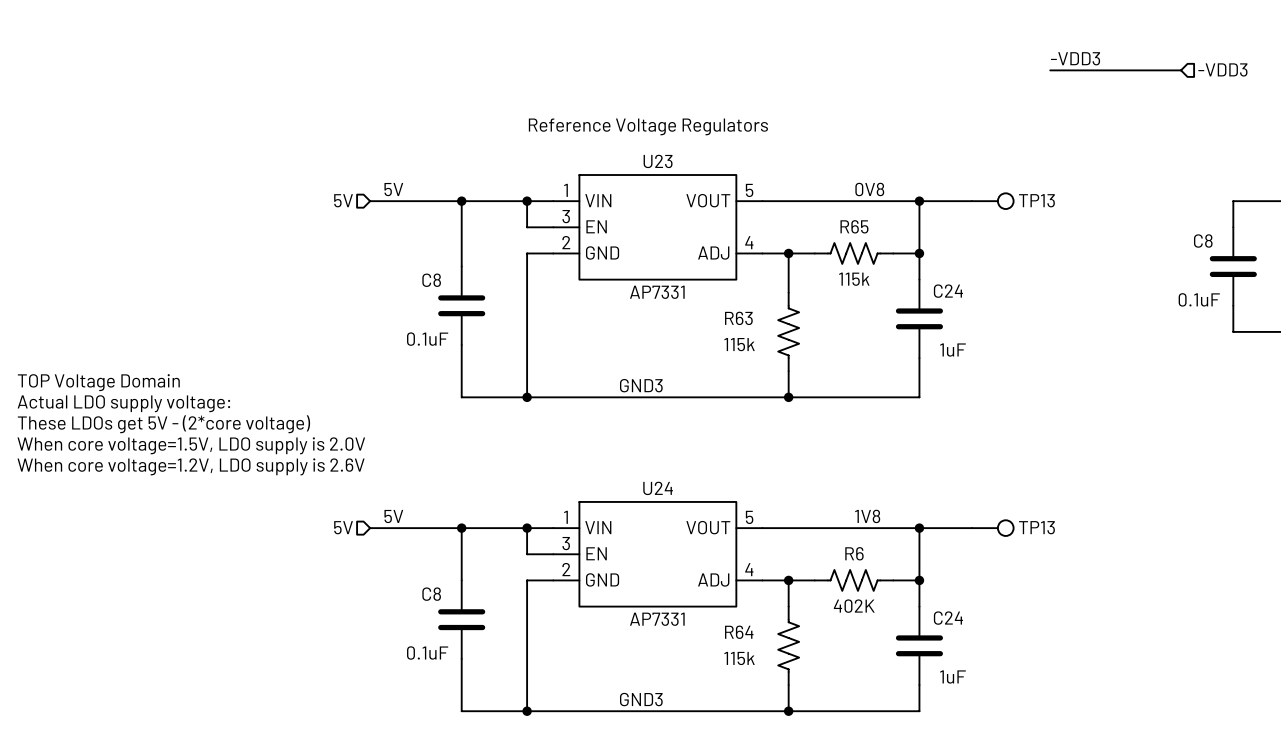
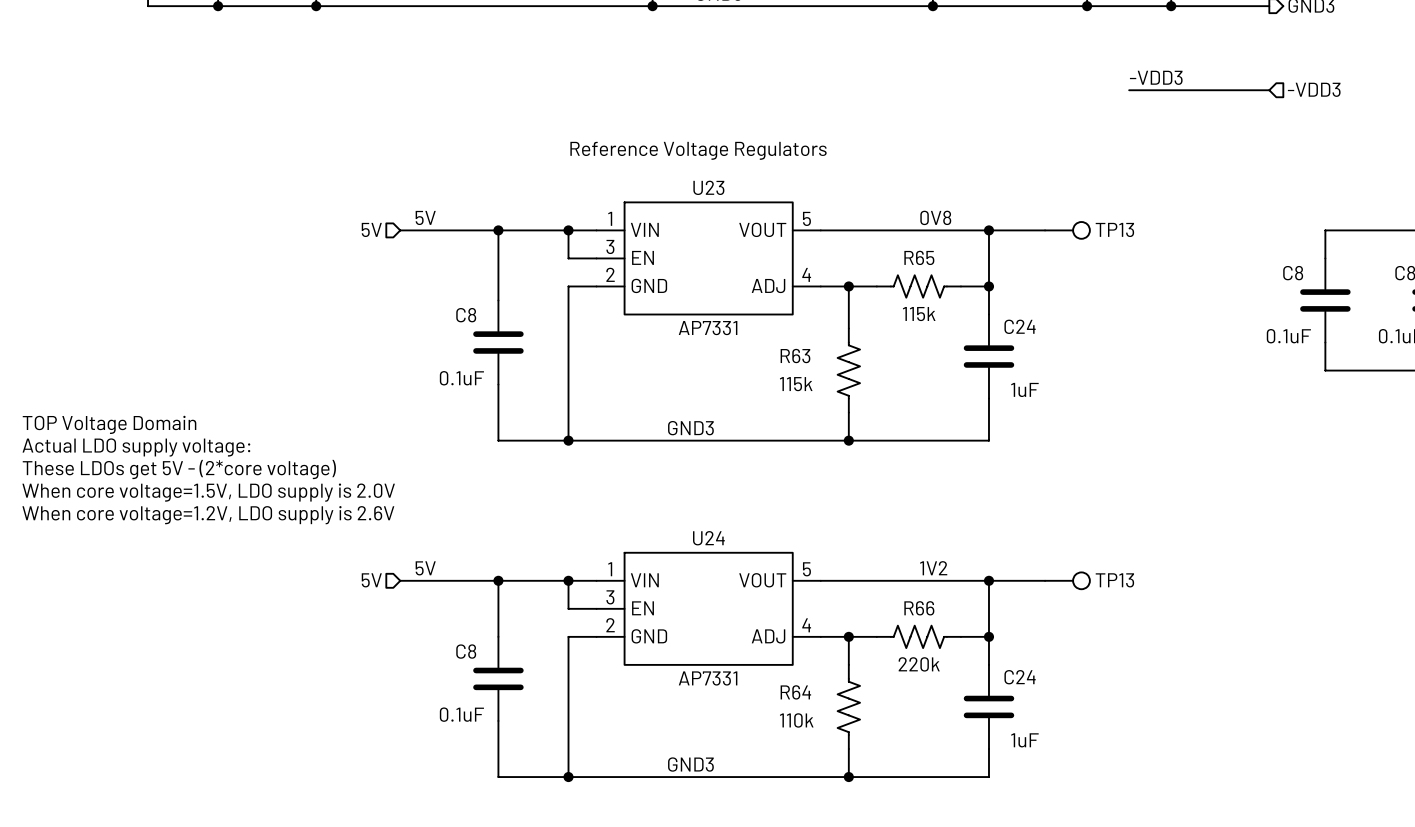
label: 1V8 (867, 516) -> 1V2 (933, 568)
R6 name: R6 (854, 553) -> R66 (919, 608)
R6 value: 402K (854, 606) -> 220k (919, 664)
R64 value: 115k (739, 658) -> 110k (796, 720)

